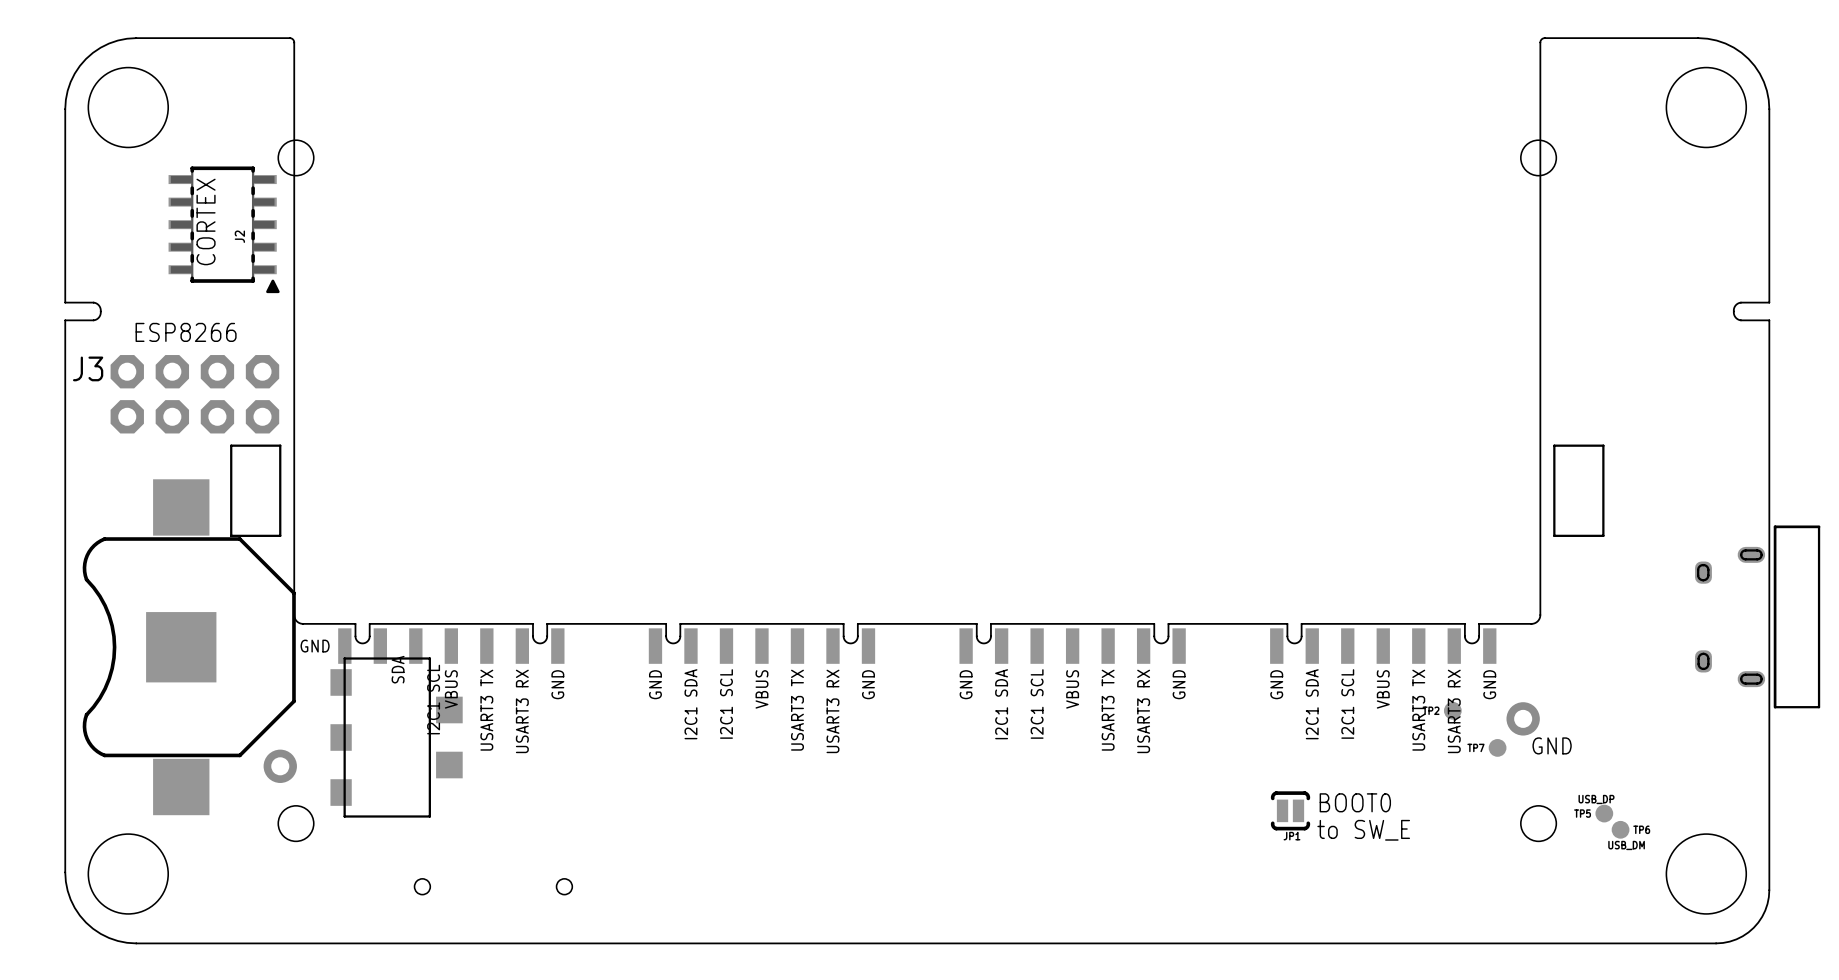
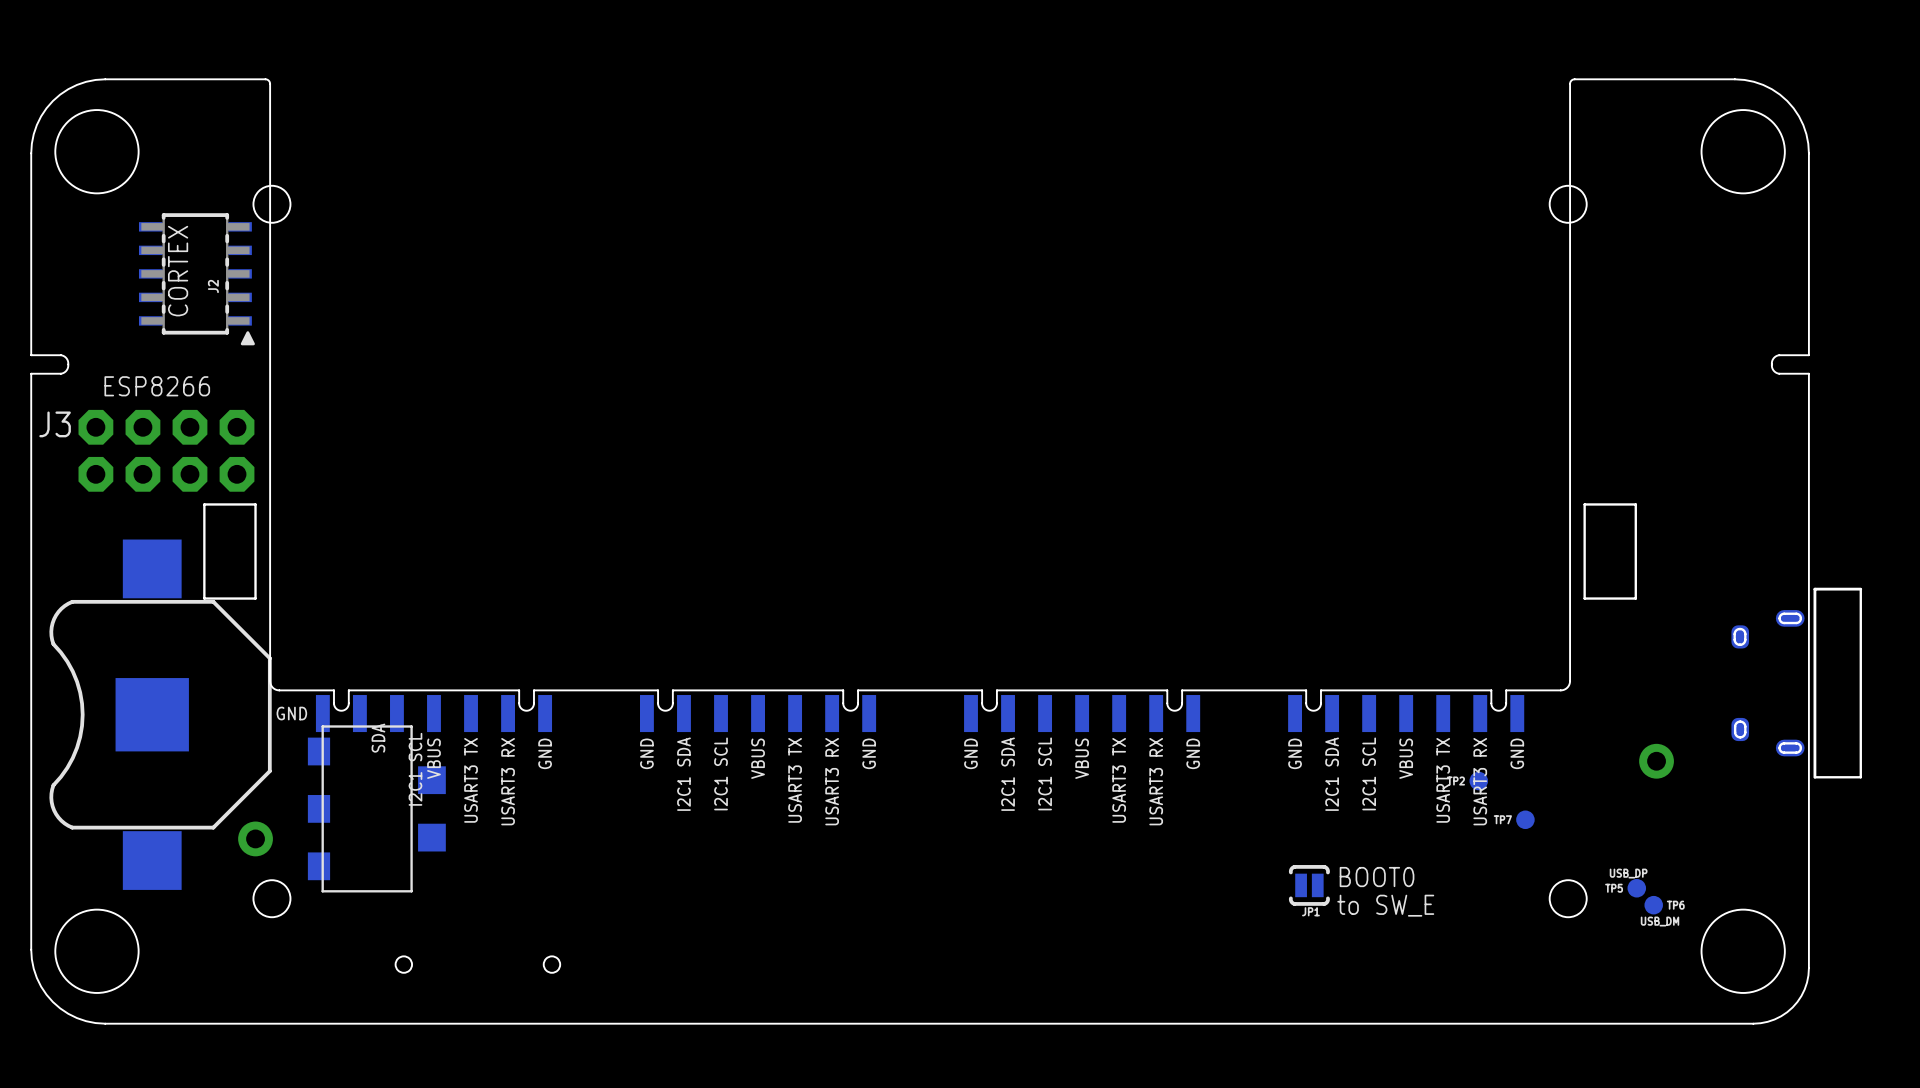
part position: (1523, 718) -> (1656, 761)
text: GND (1552, 745) -> none

